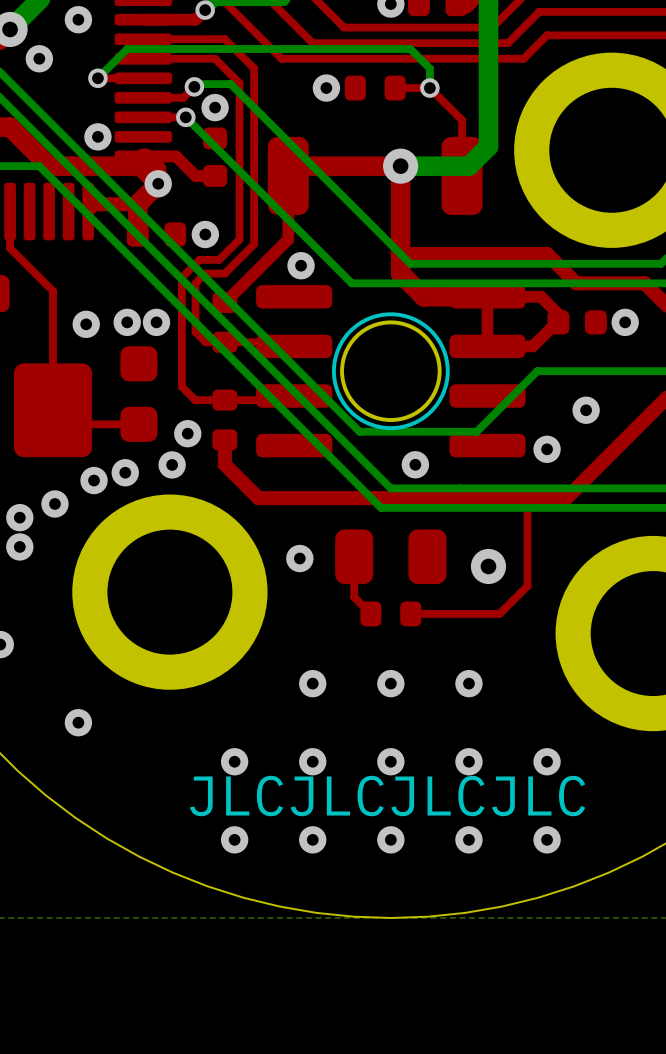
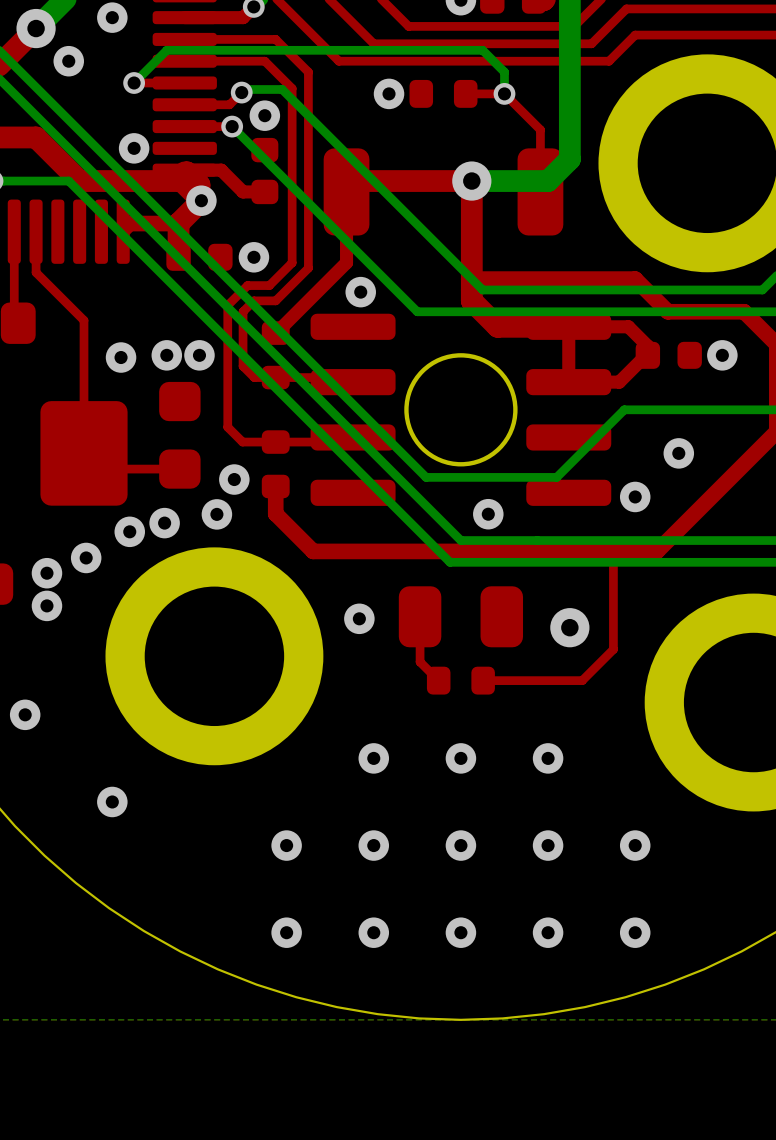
drawing: [331, 312, 450, 431] -> none
text: JLCJLCJLCJLC (387, 796) -> none

